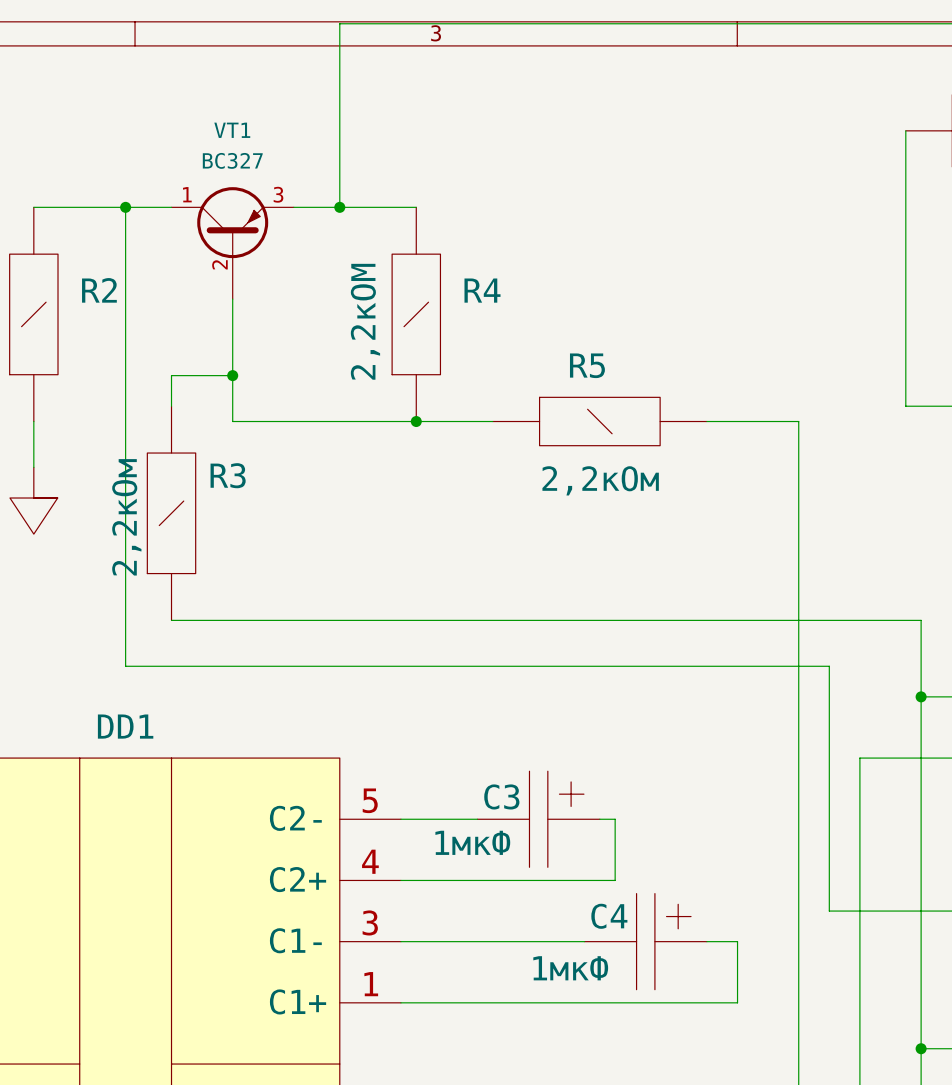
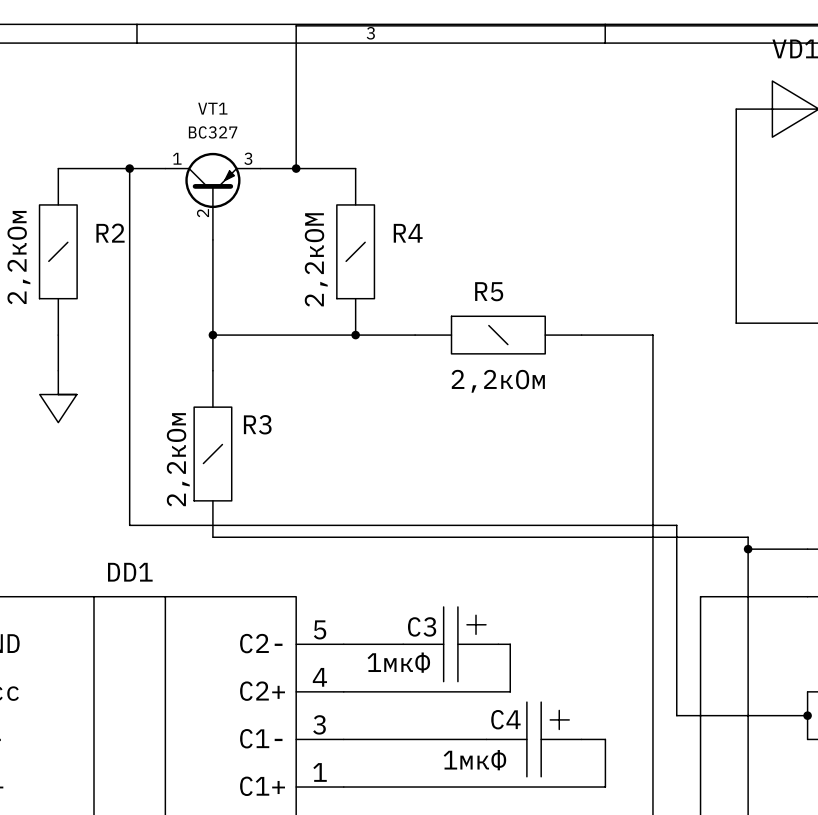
wire: (232, 375) (171, 375) (171, 406) -> none
junction position: (232, 375) -> (212, 335)
wire: none -> (212, 335) (212, 370)
R3 position: (171, 513) -> (212, 454)
wire: (171, 620) (921, 620) (921, 681) -> (212, 537) (748, 537)

